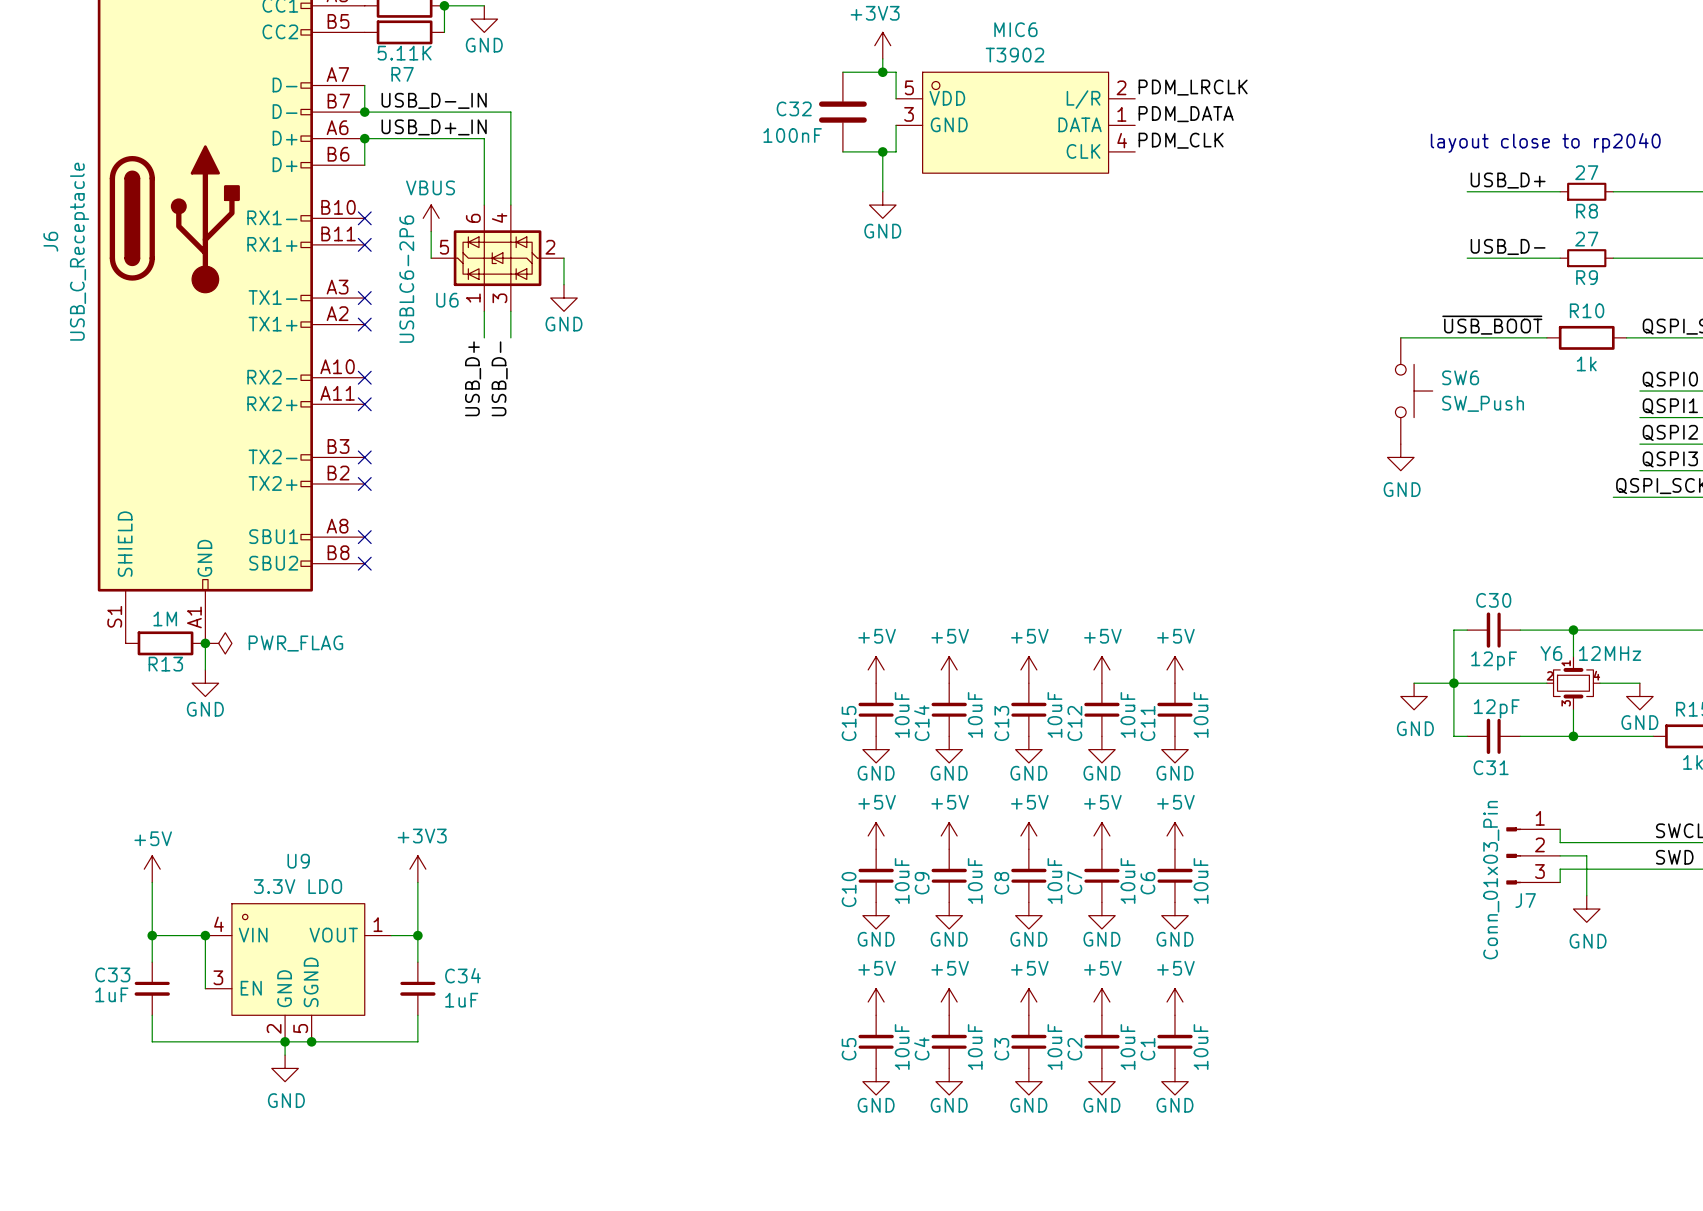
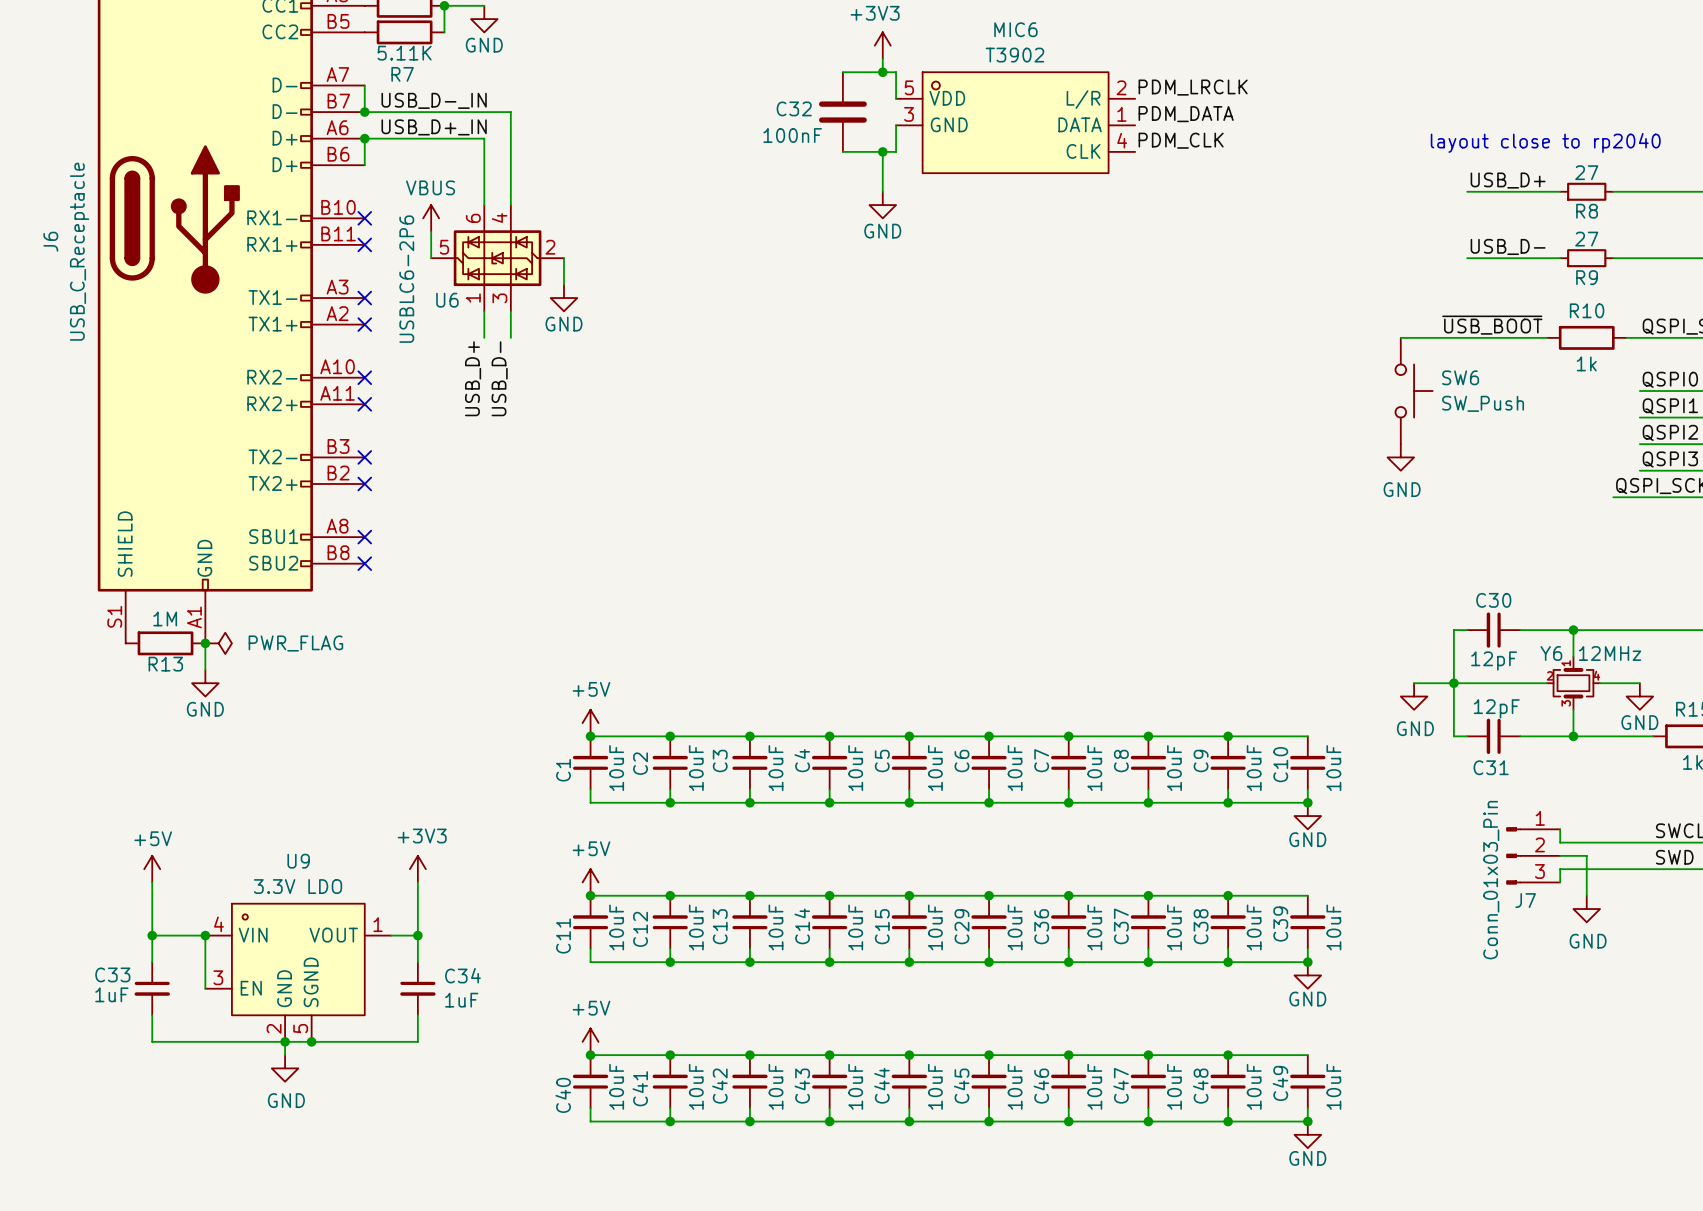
power symbol: +5V (876, 669) -> none
power symbol: +5V (949, 669) -> none
power symbol: +5V (1028, 669) -> none
power symbol: +5V (1101, 669) -> none
power symbol: +5V (1174, 669) -> none
C15 position: (876, 709) -> (909, 922)
C14 position: (949, 709) -> (829, 922)
C13 position: (1028, 709) -> (749, 922)
C12 position: (1101, 709) -> (670, 922)
C11 position: (1174, 709) -> (590, 922)
power symbol: none -> +5V (590, 723)
C15 name position: C15 (849, 723) -> C15 (882, 926)
C14 name position: C14 (921, 723) -> C14 (802, 926)
C13 name position: C13 (1001, 723) -> C13 (720, 926)
C12 name position: C12 (1074, 723) -> C12 (640, 929)
wire: none -> (590, 736) (1307, 736)
junction: none -> (590, 736)
junction: none -> (670, 736)
junction: none -> (749, 736)
junction: none -> (829, 736)
junction: none -> (909, 736)
junction: none -> (989, 736)
junction: none -> (1068, 736)
junction: none -> (1148, 736)
junction: none -> (1228, 736)
power symbol: GND (876, 749) -> none
power symbol: GND (949, 749) -> none
power symbol: GND (1028, 749) -> none
power symbol: GND (1101, 749) -> none
power symbol: GND (1174, 749) -> none
wire: none -> (590, 789) (590, 802) (1307, 802) (1307, 789)
wire: none -> (670, 789) (670, 802)
wire: none -> (749, 789) (749, 802)
wire: none -> (829, 789) (829, 802)
wire: none -> (909, 789) (909, 802)
wire: none -> (989, 789) (989, 802)
wire: none -> (1068, 789) (1068, 802)
wire: none -> (1148, 789) (1148, 802)
wire: none -> (1228, 789) (1228, 802)
junction: none -> (670, 802)
junction: none -> (749, 802)
junction: none -> (829, 802)
junction: none -> (909, 802)
junction: none -> (989, 802)
junction: none -> (1068, 802)
junction: none -> (1148, 802)
junction: none -> (1228, 802)
junction: none -> (1307, 802)
power symbol: none -> GND (1307, 816)
power symbol: +5V (876, 835) -> none
power symbol: +5V (949, 835) -> none
power symbol: +5V (1028, 835) -> none
power symbol: +5V (1101, 835) -> none
power symbol: +5V (1174, 835) -> none
C10 position: (876, 875) -> (1307, 762)
C9 position: (949, 875) -> (1228, 762)
C8 position: (1028, 875) -> (1148, 762)
C7 position: (1101, 875) -> (1068, 762)
C6 position: (1174, 875) -> (989, 762)
power symbol: none -> +5V (590, 882)
C7 name position: C7 (1074, 882) -> C7 (1041, 760)
C9 name position: C9 (922, 883) -> C9 (1201, 760)
C8 name position: C8 (1001, 883) -> C8 (1121, 760)
C6 name position: C6 (1147, 883) -> C6 (961, 760)
C10 name position: C10 (849, 889) -> C10 (1280, 764)
wire: none -> (590, 895) (1307, 895)
junction: none -> (590, 895)
junction: none -> (670, 895)
junction: none -> (749, 895)
junction: none -> (829, 895)
junction: none -> (909, 895)
junction: none -> (989, 895)
junction: none -> (1068, 895)
junction: none -> (1148, 895)
junction: none -> (1228, 895)
power symbol: GND (876, 915) -> none
power symbol: GND (949, 915) -> none
power symbol: GND (1028, 915) -> none
power symbol: GND (1101, 915) -> none
power symbol: GND (1174, 915) -> none
C29: none -> 10uF (989, 922)
C36: none -> 10uF (1068, 922)
C37: none -> 10uF (1148, 922)
C38: none -> 10uF (1228, 922)
C39: none -> 10uF (1307, 922)
wire: none -> (590, 948) (590, 962) (1307, 962) (1307, 948)
wire: none -> (670, 948) (670, 962)
wire: none -> (749, 948) (749, 962)
wire: none -> (829, 948) (829, 962)
wire: none -> (909, 948) (909, 962)
wire: none -> (989, 948) (989, 962)
wire: none -> (1068, 948) (1068, 962)
wire: none -> (1148, 948) (1148, 962)
wire: none -> (1228, 948) (1228, 962)
junction: none -> (670, 962)
junction: none -> (749, 962)
junction: none -> (829, 962)
junction: none -> (909, 962)
junction: none -> (989, 962)
junction: none -> (1068, 962)
junction: none -> (1148, 962)
junction: none -> (1228, 962)
junction: none -> (1307, 962)
power symbol: none -> GND (1307, 975)
power symbol: +5V (876, 1002) -> none
power symbol: +5V (949, 1002) -> none
power symbol: +5V (1028, 1002) -> none
power symbol: +5V (1101, 1002) -> none
power symbol: +5V (1174, 1002) -> none
power symbol: none -> +5V (590, 1041)
C5 position: (876, 1041) -> (909, 762)
C4 position: (949, 1041) -> (829, 762)
C3 position: (1028, 1041) -> (749, 762)
C2 position: (1101, 1041) -> (670, 762)
C1 position: (1174, 1041) -> (590, 762)
C4 name position: C4 (921, 1048) -> C4 (802, 760)
C5 name position: C5 (849, 1049) -> C5 (882, 760)
C3 name position: C3 (1001, 1049) -> C3 (720, 760)
C2 name position: C2 (1074, 1049) -> C2 (640, 763)
wire: none -> (590, 1055) (1307, 1055)
junction: none -> (590, 1055)
junction: none -> (670, 1055)
junction: none -> (749, 1055)
junction: none -> (829, 1055)
junction: none -> (909, 1055)
junction: none -> (989, 1055)
junction: none -> (1068, 1055)
junction: none -> (1148, 1055)
junction: none -> (1228, 1055)
C40: none -> 10uF (590, 1081)
C41: none -> 10uF (670, 1081)
C42: none -> 10uF (749, 1081)
C43: none -> 10uF (829, 1081)
power symbol: GND (876, 1081) -> none
C44: none -> 10uF (909, 1081)
power symbol: GND (949, 1081) -> none
C45: none -> 10uF (989, 1081)
power symbol: GND (1028, 1081) -> none
C46: none -> 10uF (1068, 1081)
power symbol: GND (1101, 1081) -> none
C47: none -> 10uF (1148, 1081)
power symbol: GND (1174, 1081) -> none
C48: none -> 10uF (1228, 1081)
C49: none -> 10uF (1307, 1081)
wire: none -> (590, 1108) (590, 1121) (1307, 1121) (1307, 1108)
wire: none -> (670, 1108) (670, 1121)
wire: none -> (749, 1108) (749, 1121)
wire: none -> (829, 1108) (829, 1121)
wire: none -> (909, 1108) (909, 1121)
wire: none -> (989, 1108) (989, 1121)
wire: none -> (1068, 1108) (1068, 1121)
wire: none -> (1148, 1108) (1148, 1121)
wire: none -> (1228, 1108) (1228, 1121)
junction: none -> (670, 1121)
junction: none -> (749, 1121)
junction: none -> (829, 1121)
junction: none -> (909, 1121)
junction: none -> (989, 1121)
junction: none -> (1068, 1121)
junction: none -> (1148, 1121)
junction: none -> (1228, 1121)
junction: none -> (1307, 1121)
power symbol: none -> GND (1307, 1134)

